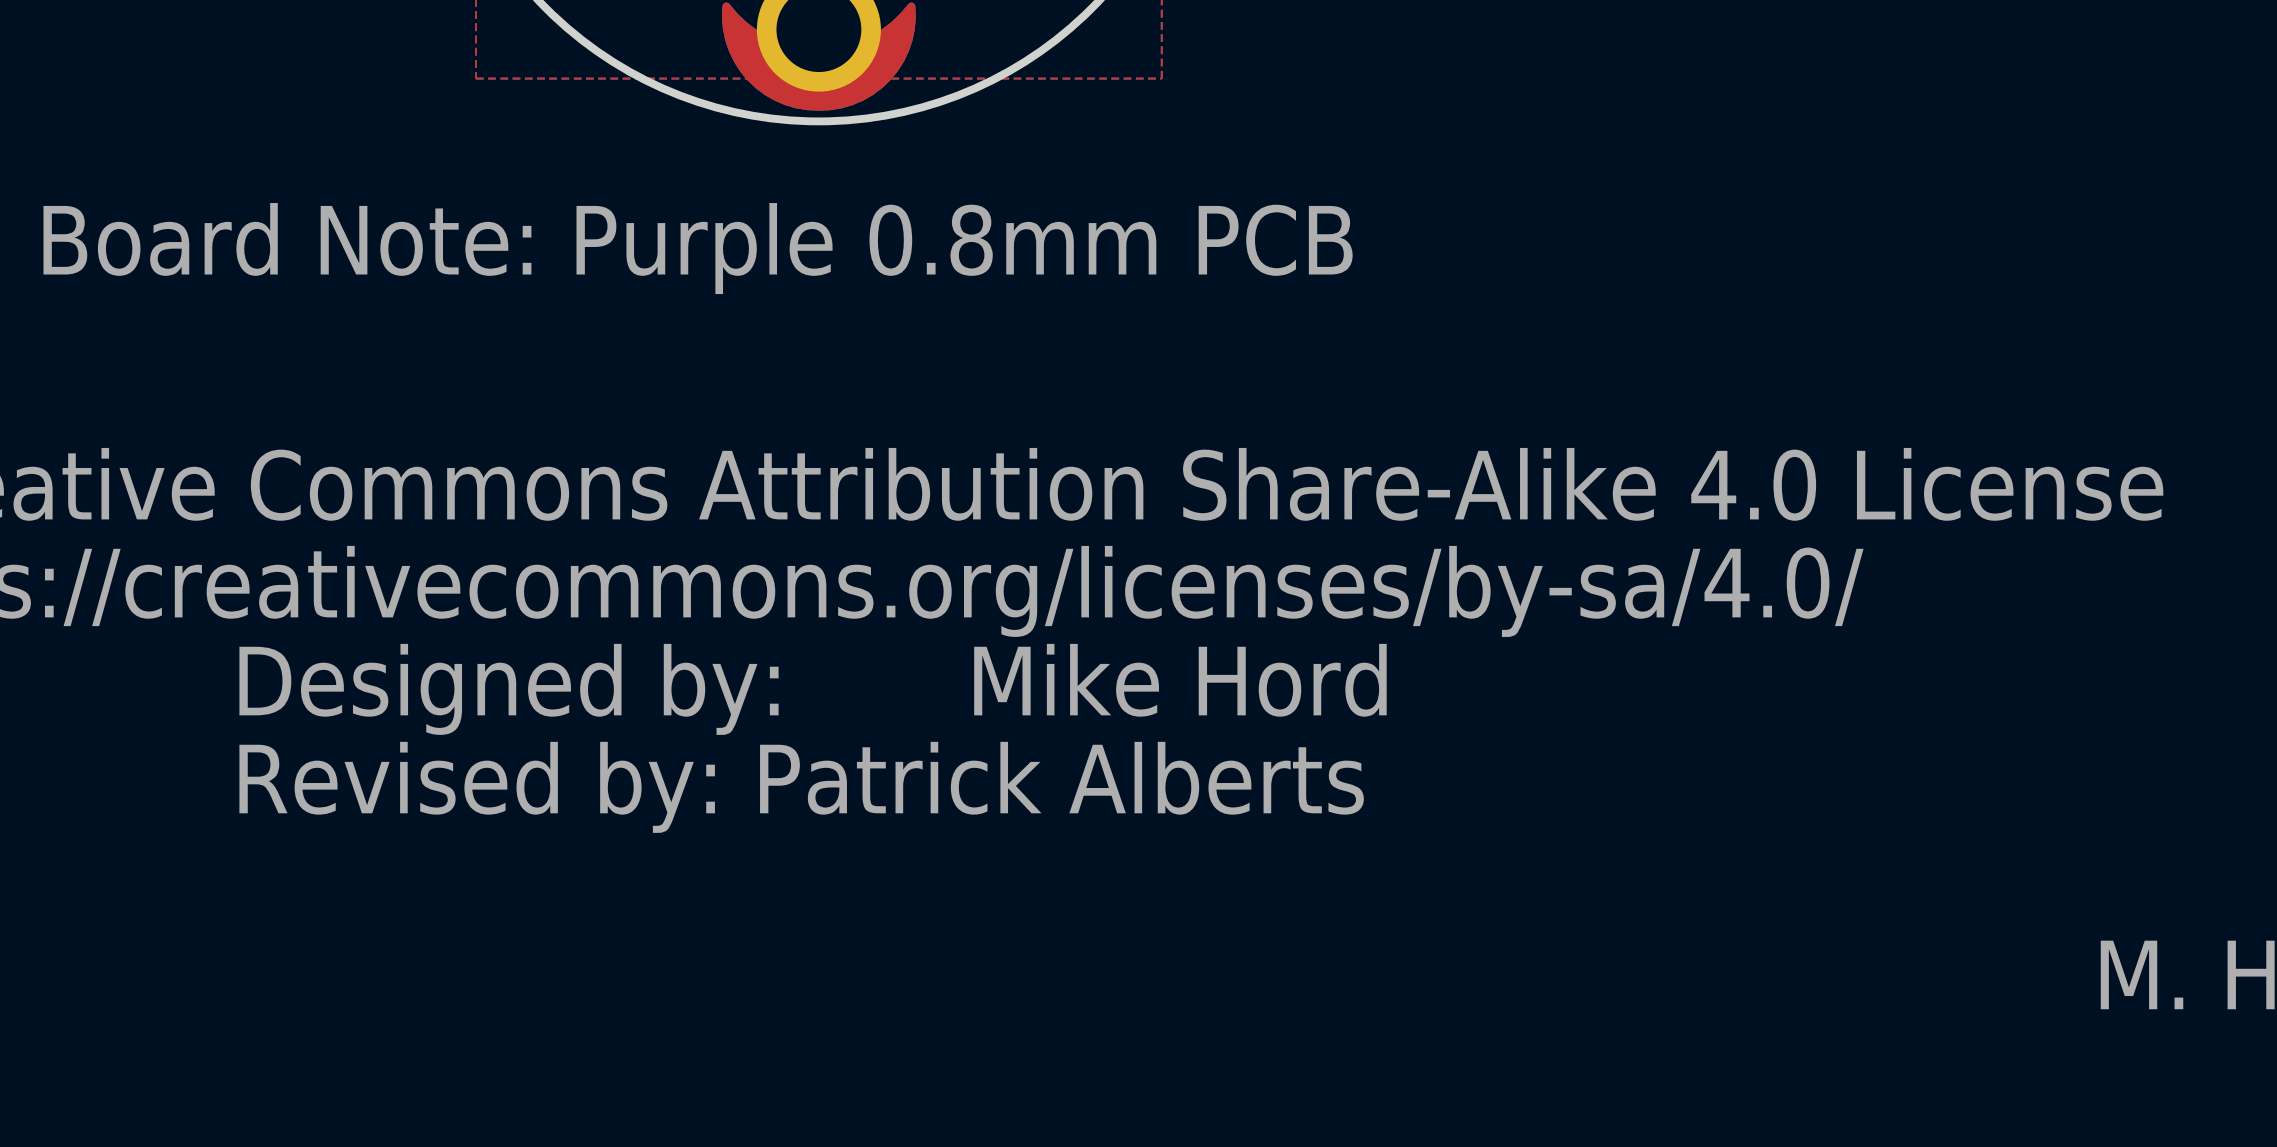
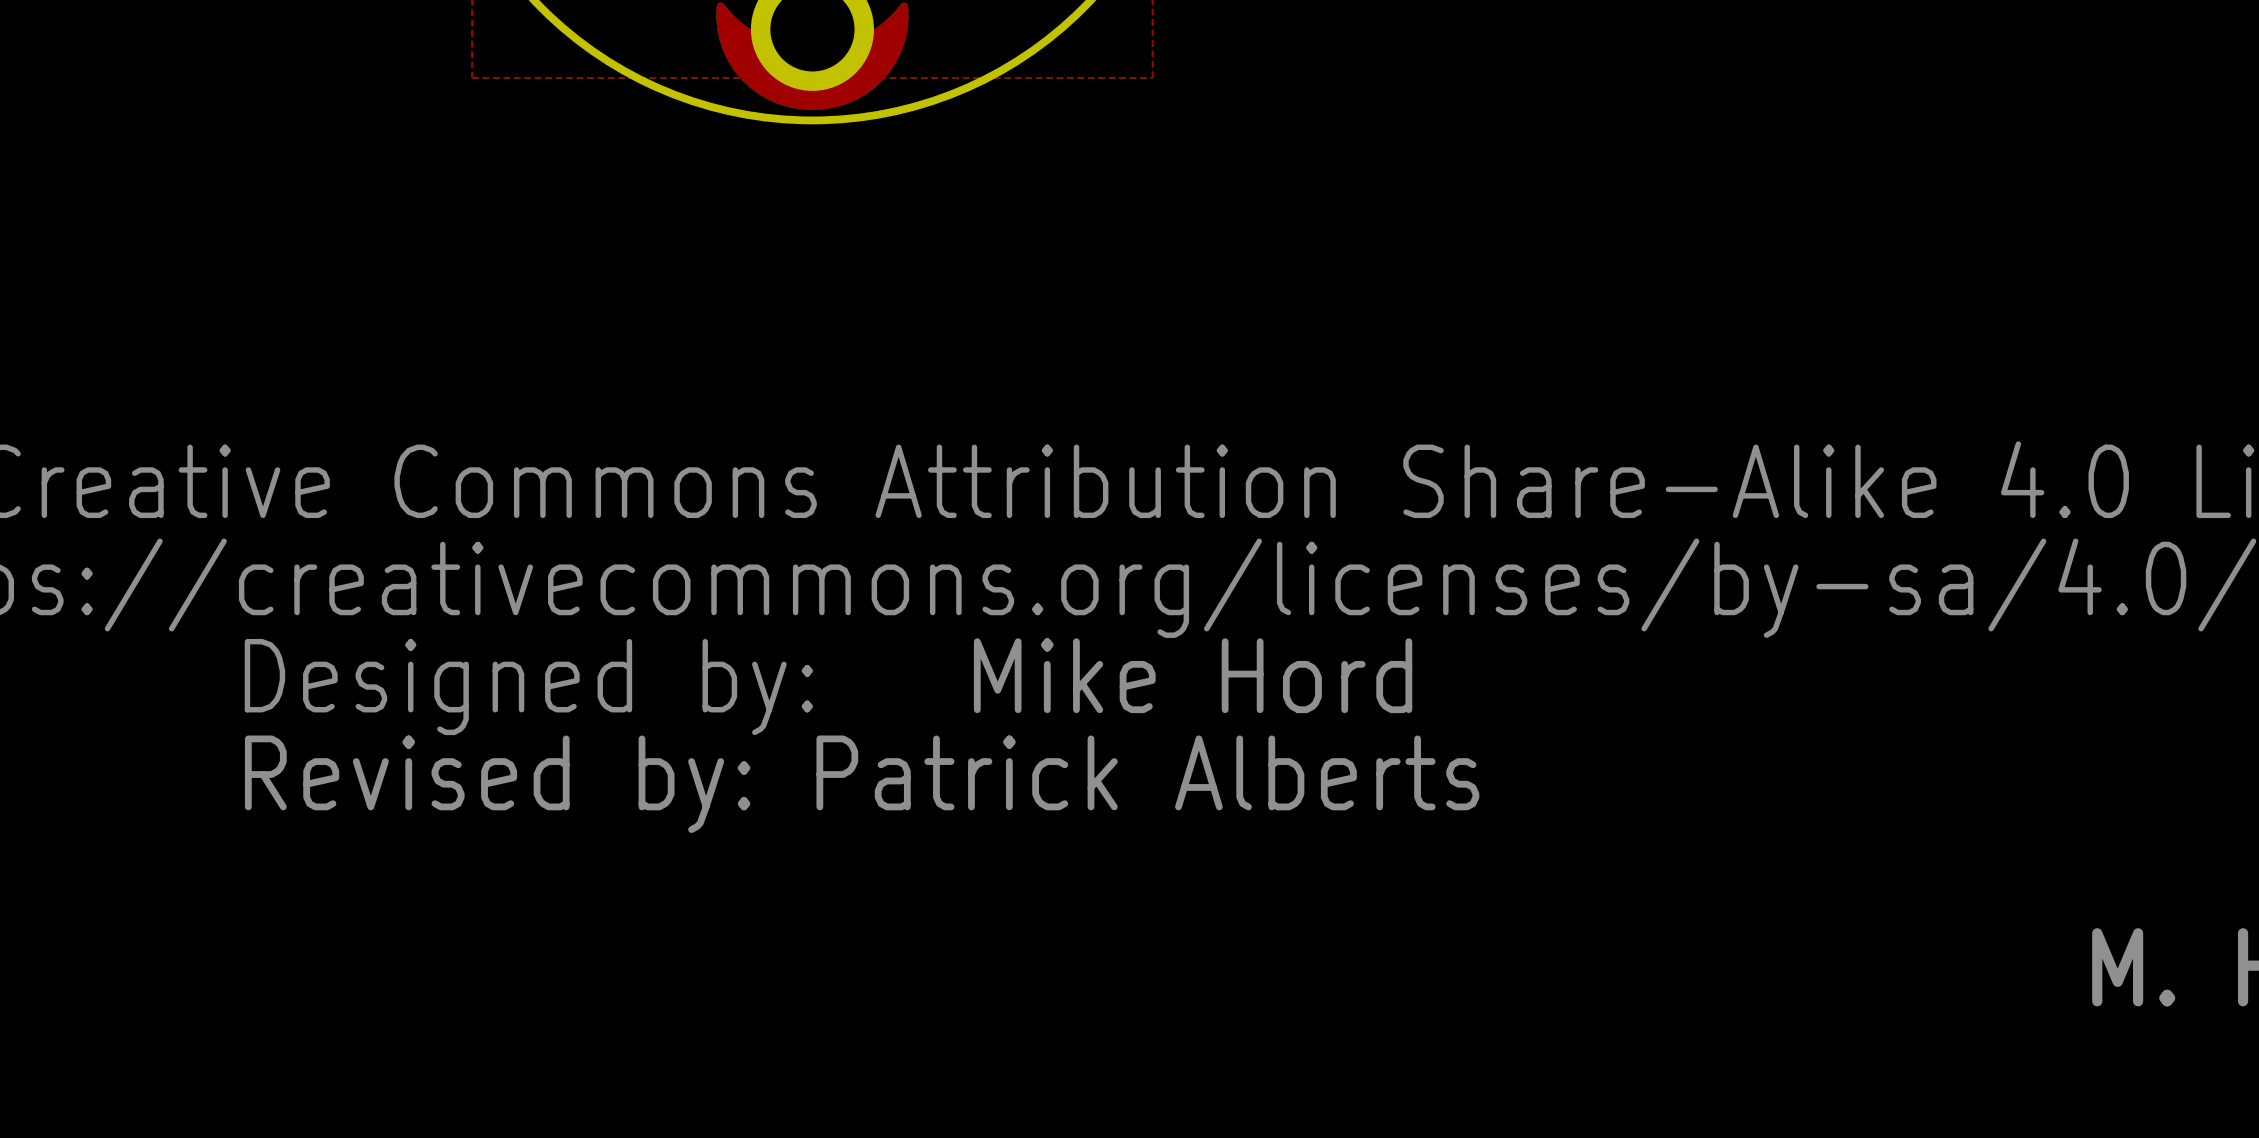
text: Board Note: Purple 0.8mm PCB (698, 248) -> none

